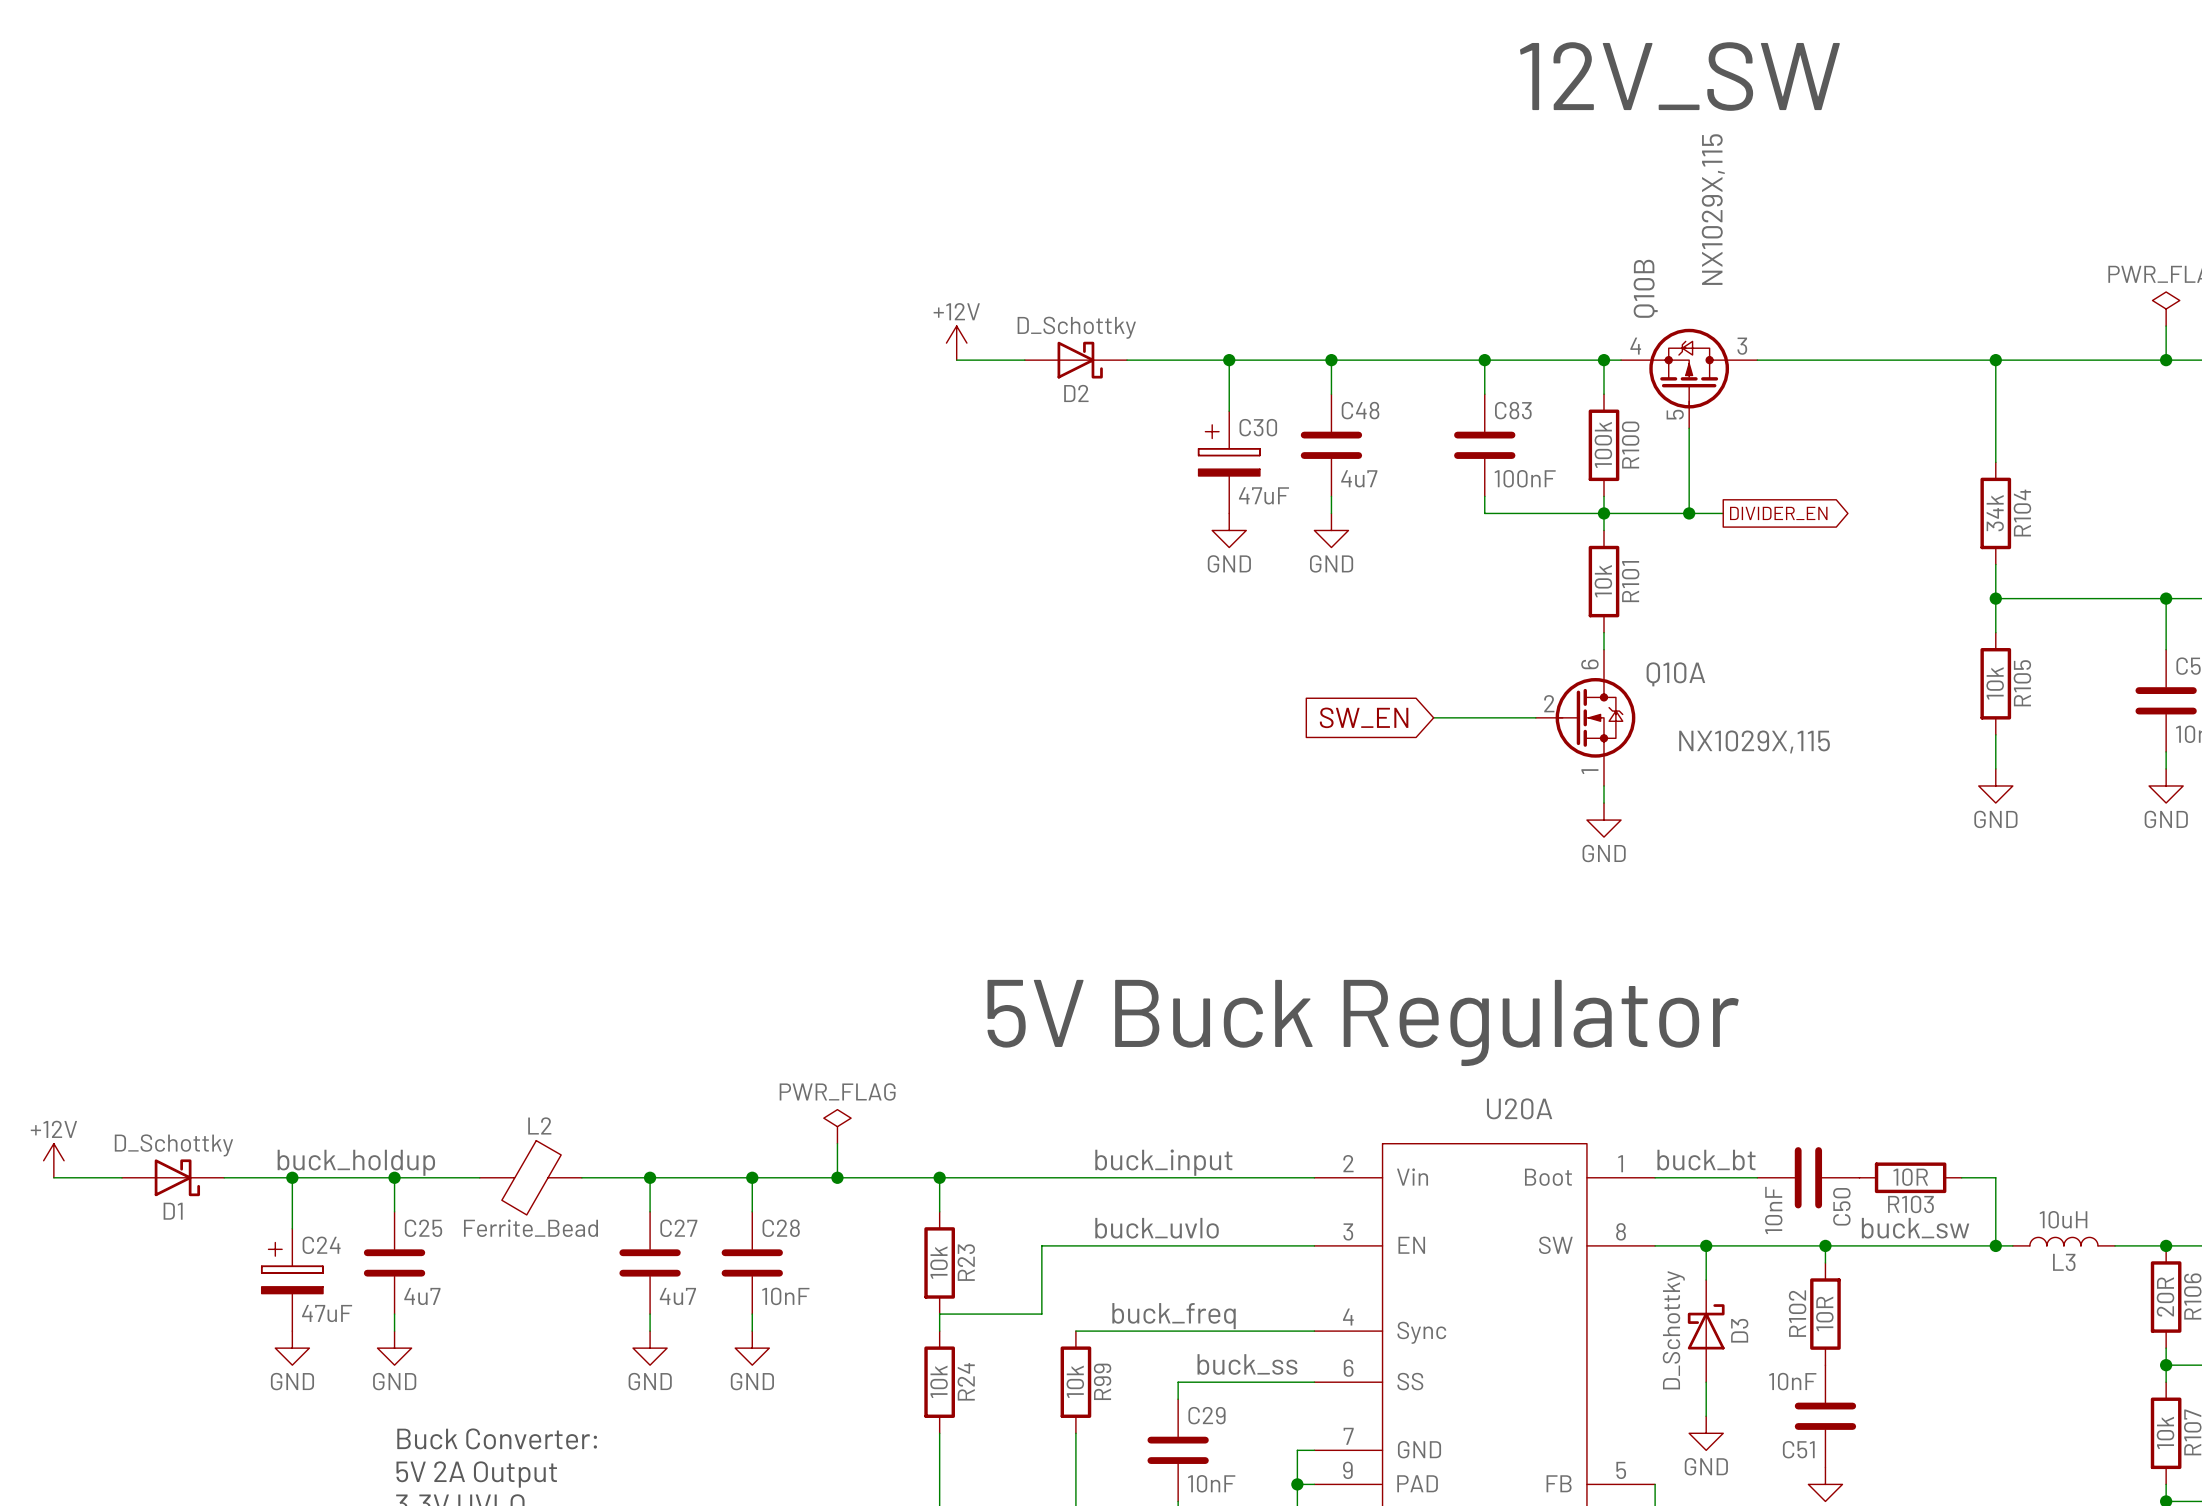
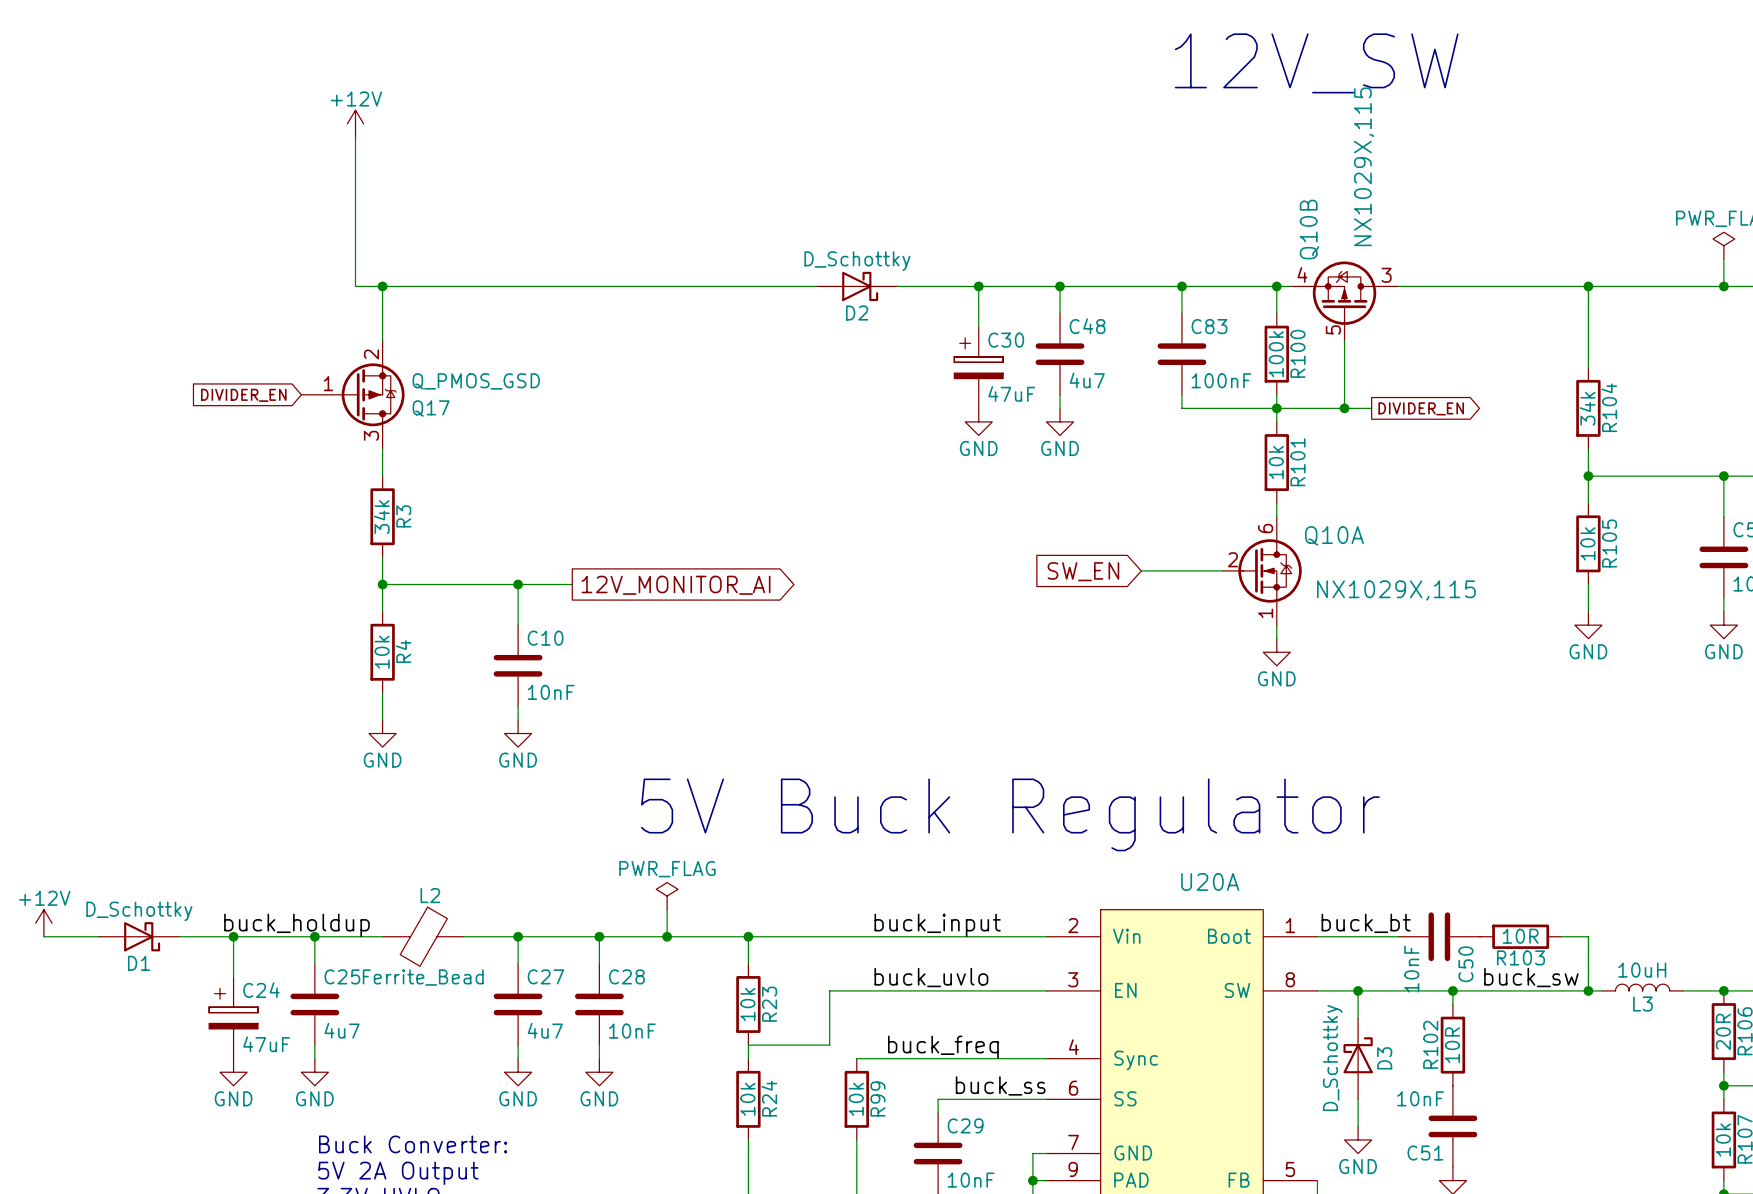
power symbol: none -> +12V (355, 123)
wire: none -> (355, 137) (355, 286) (761, 286)
power symbol: +12V (956, 343) -> none
wire: none -> (382, 286) (382, 340)
junction: none -> (382, 286)
global label: none -> DIVIDER_EN (243, 395)
Q17: none -> Q_PMOS_GSD (352, 394)
wire: none -> (382, 449) (382, 476)
R3: none -> 34k (382, 516)
wire: none -> (382, 557) (382, 611)
wire: none -> (382, 584) (572, 584)
junction: none -> (382, 584)
wire: none -> (518, 584) (518, 625)
junction: none -> (518, 584)
global label: none -> 12V_MONITOR_AI (676, 585)
R4: none -> 10k (382, 652)
C10: none -> 10nF (518, 665)
wire: none -> (382, 692) (382, 719)
wire: none -> (518, 706) (518, 719)
power symbol: none -> GND (382, 733)
power symbol: none -> GND (518, 733)

